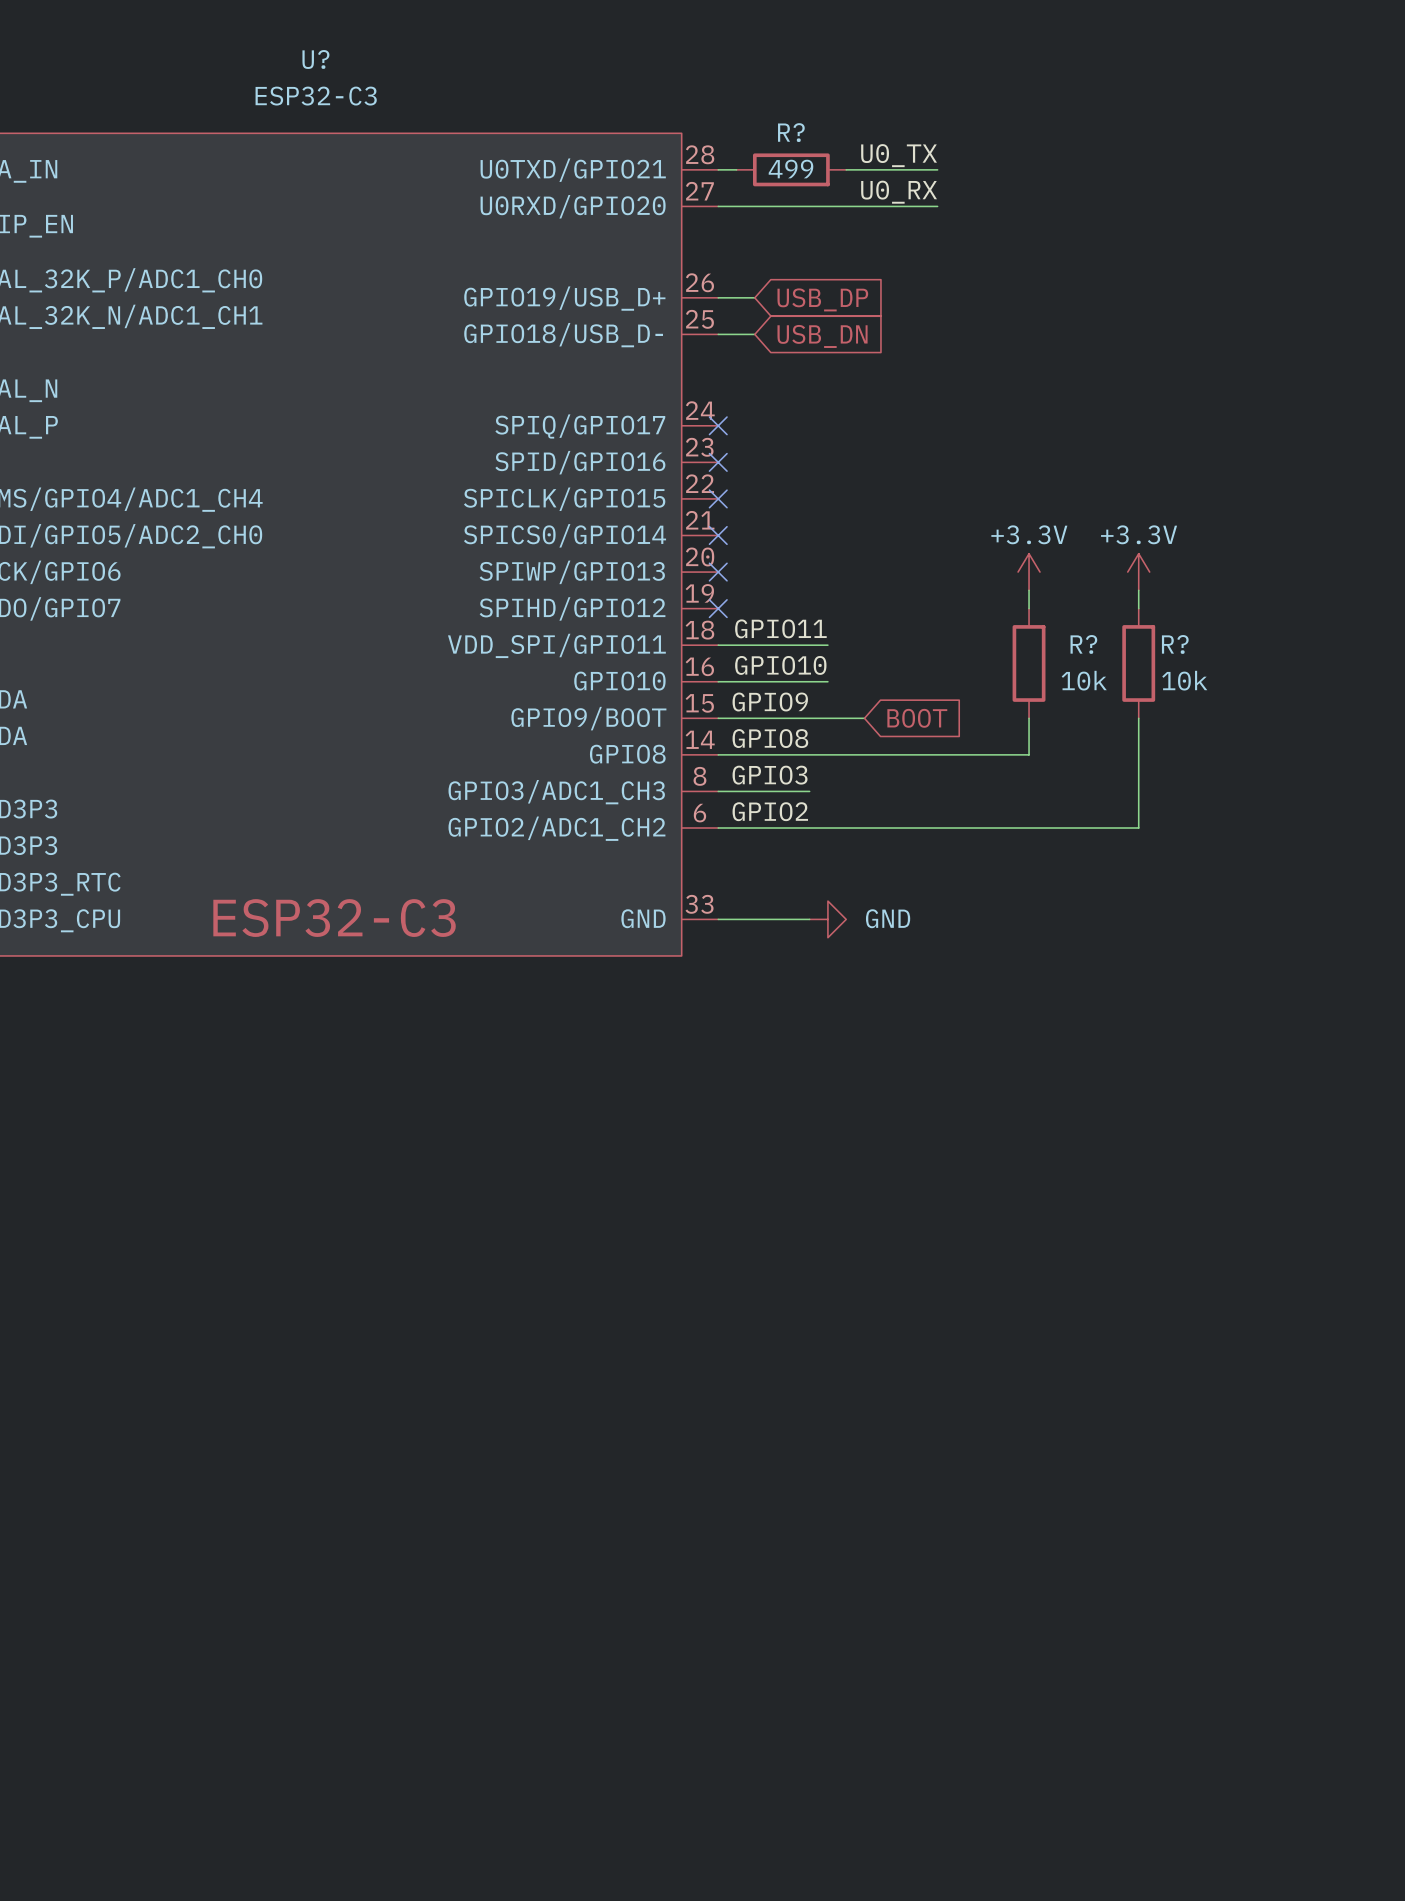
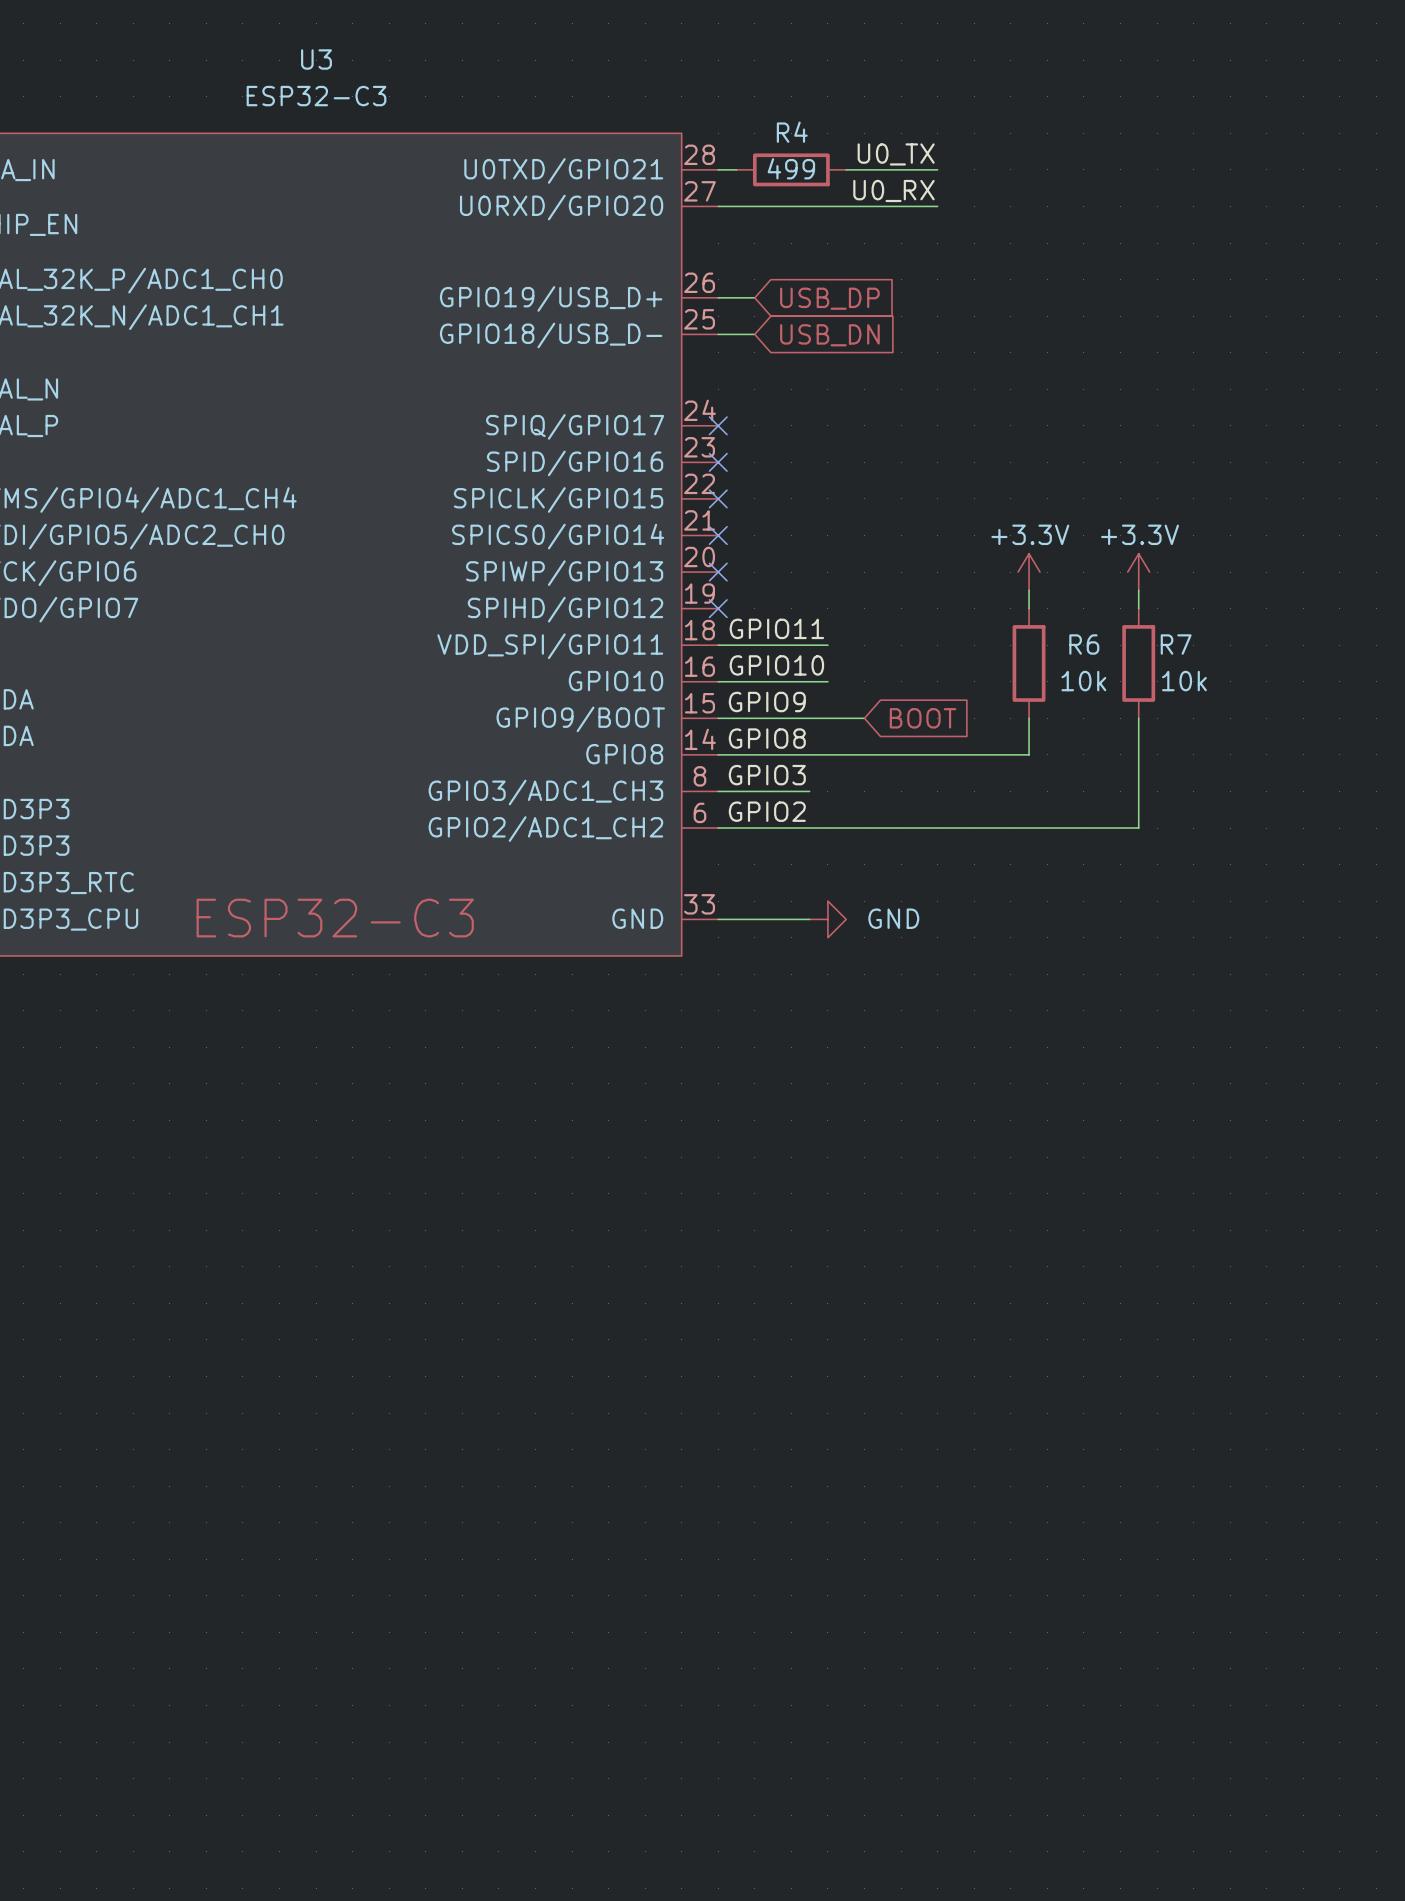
U? name: U? (315, 59) -> U3 (316, 59)
R? name: R? (791, 132) -> R4 (792, 132)
R? name: R? (1083, 644) -> R6 (1084, 644)
R? name: R? (1175, 644) -> R7 (1176, 644)

